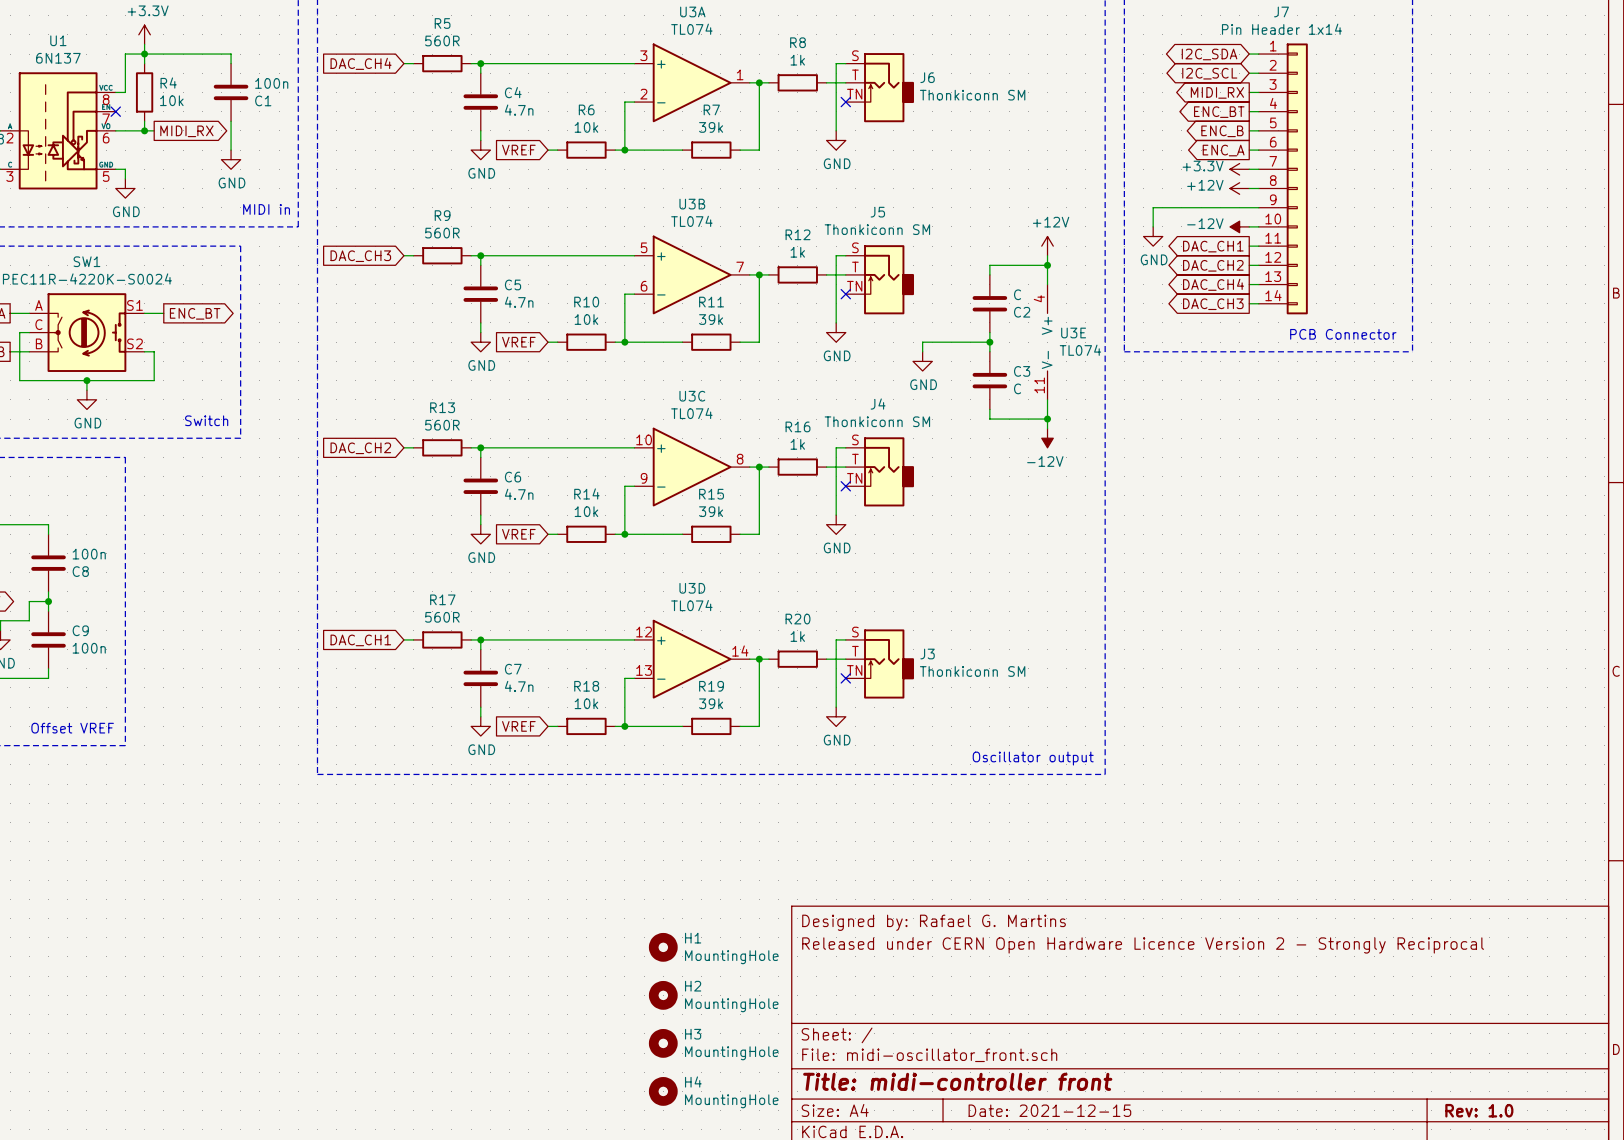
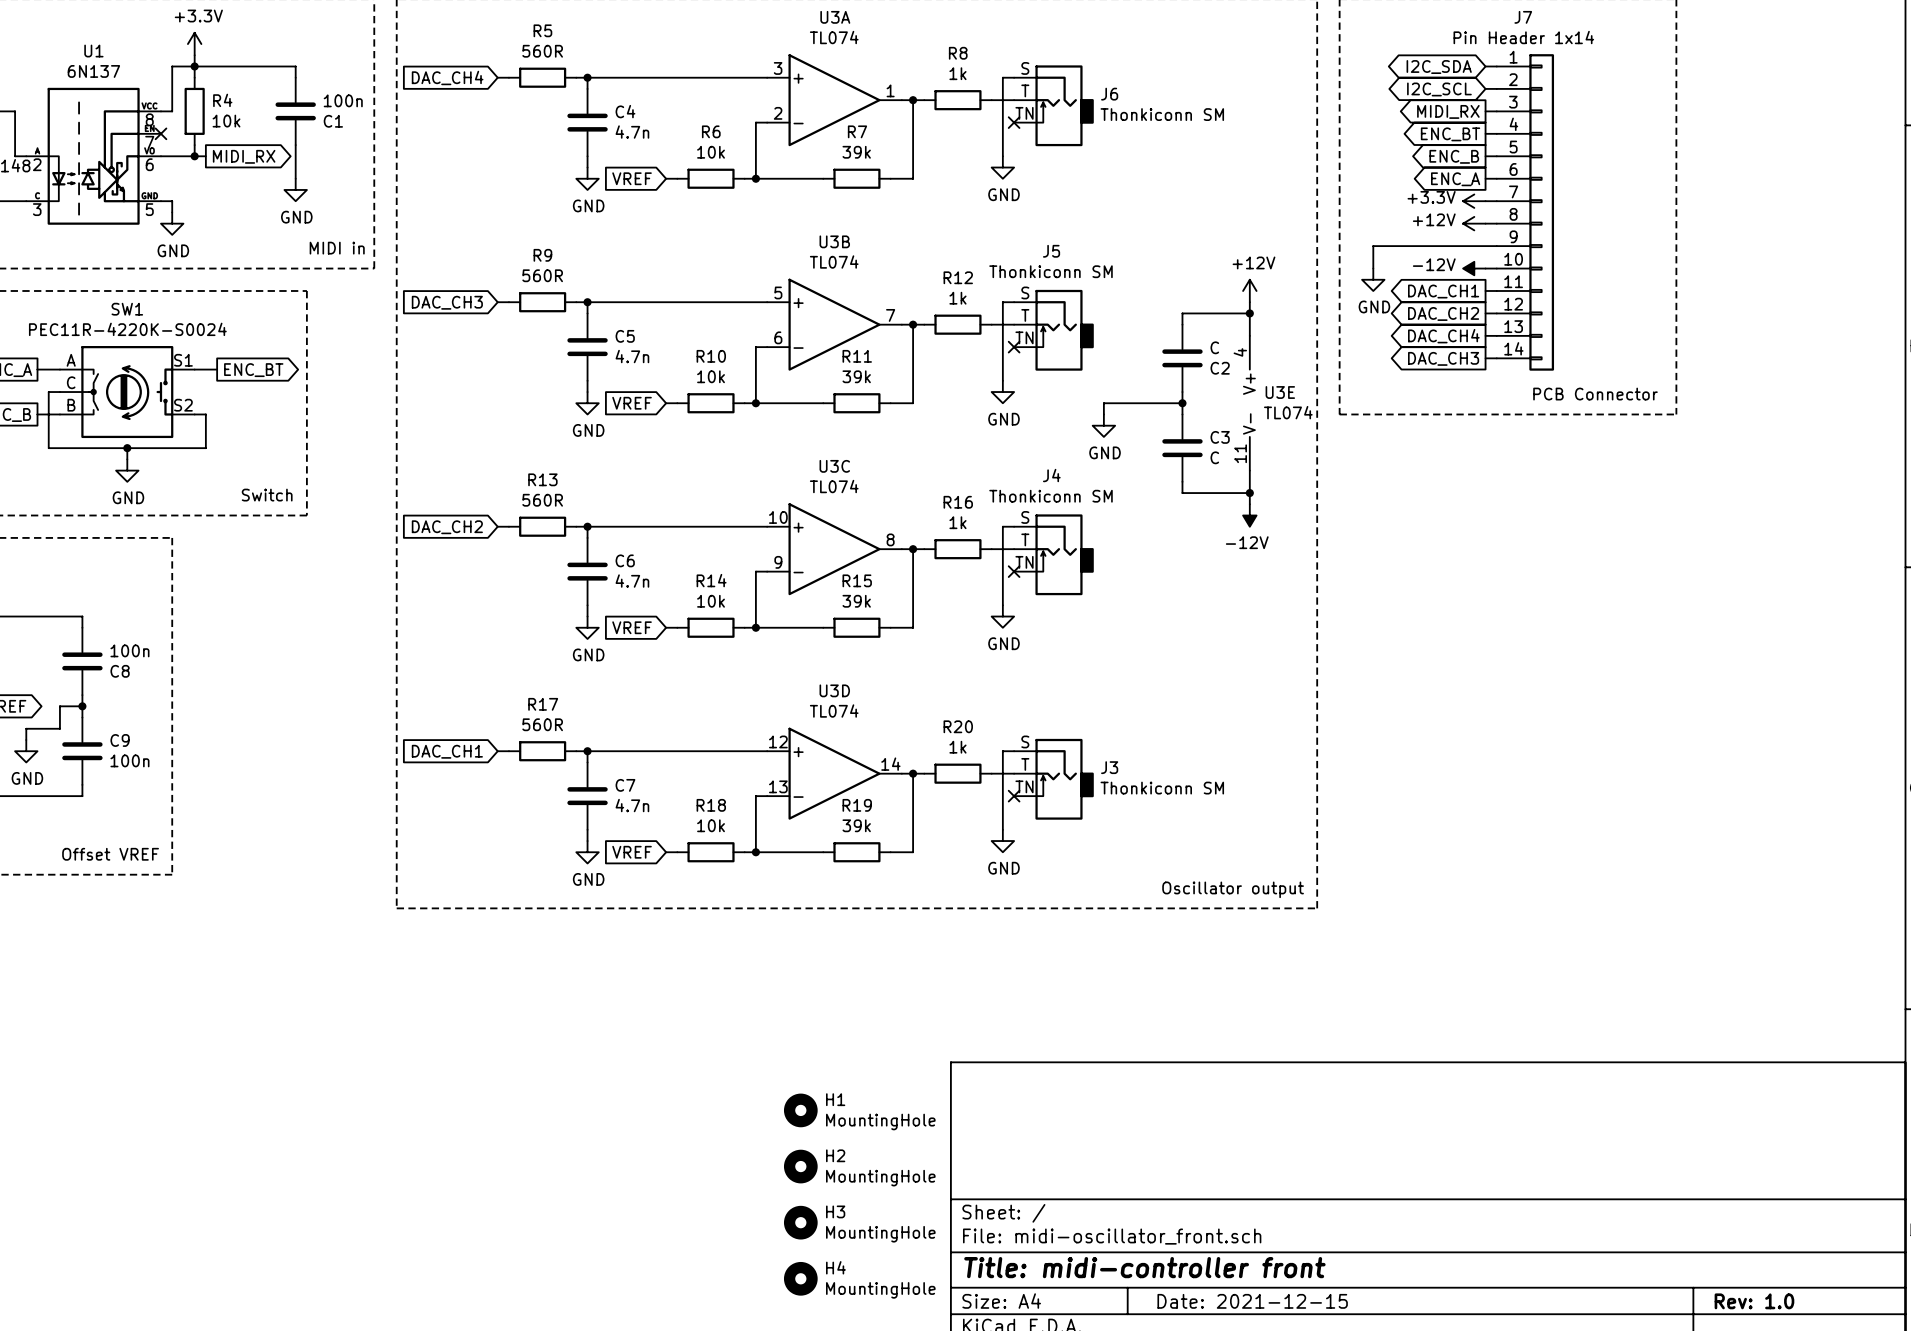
title block: Designed by: Rafael G. Martins (934, 922) -> none
title block: Released under CERN Open Hardware Licence Version 2 - Strongly Reciprocal (1143, 945) -> none

